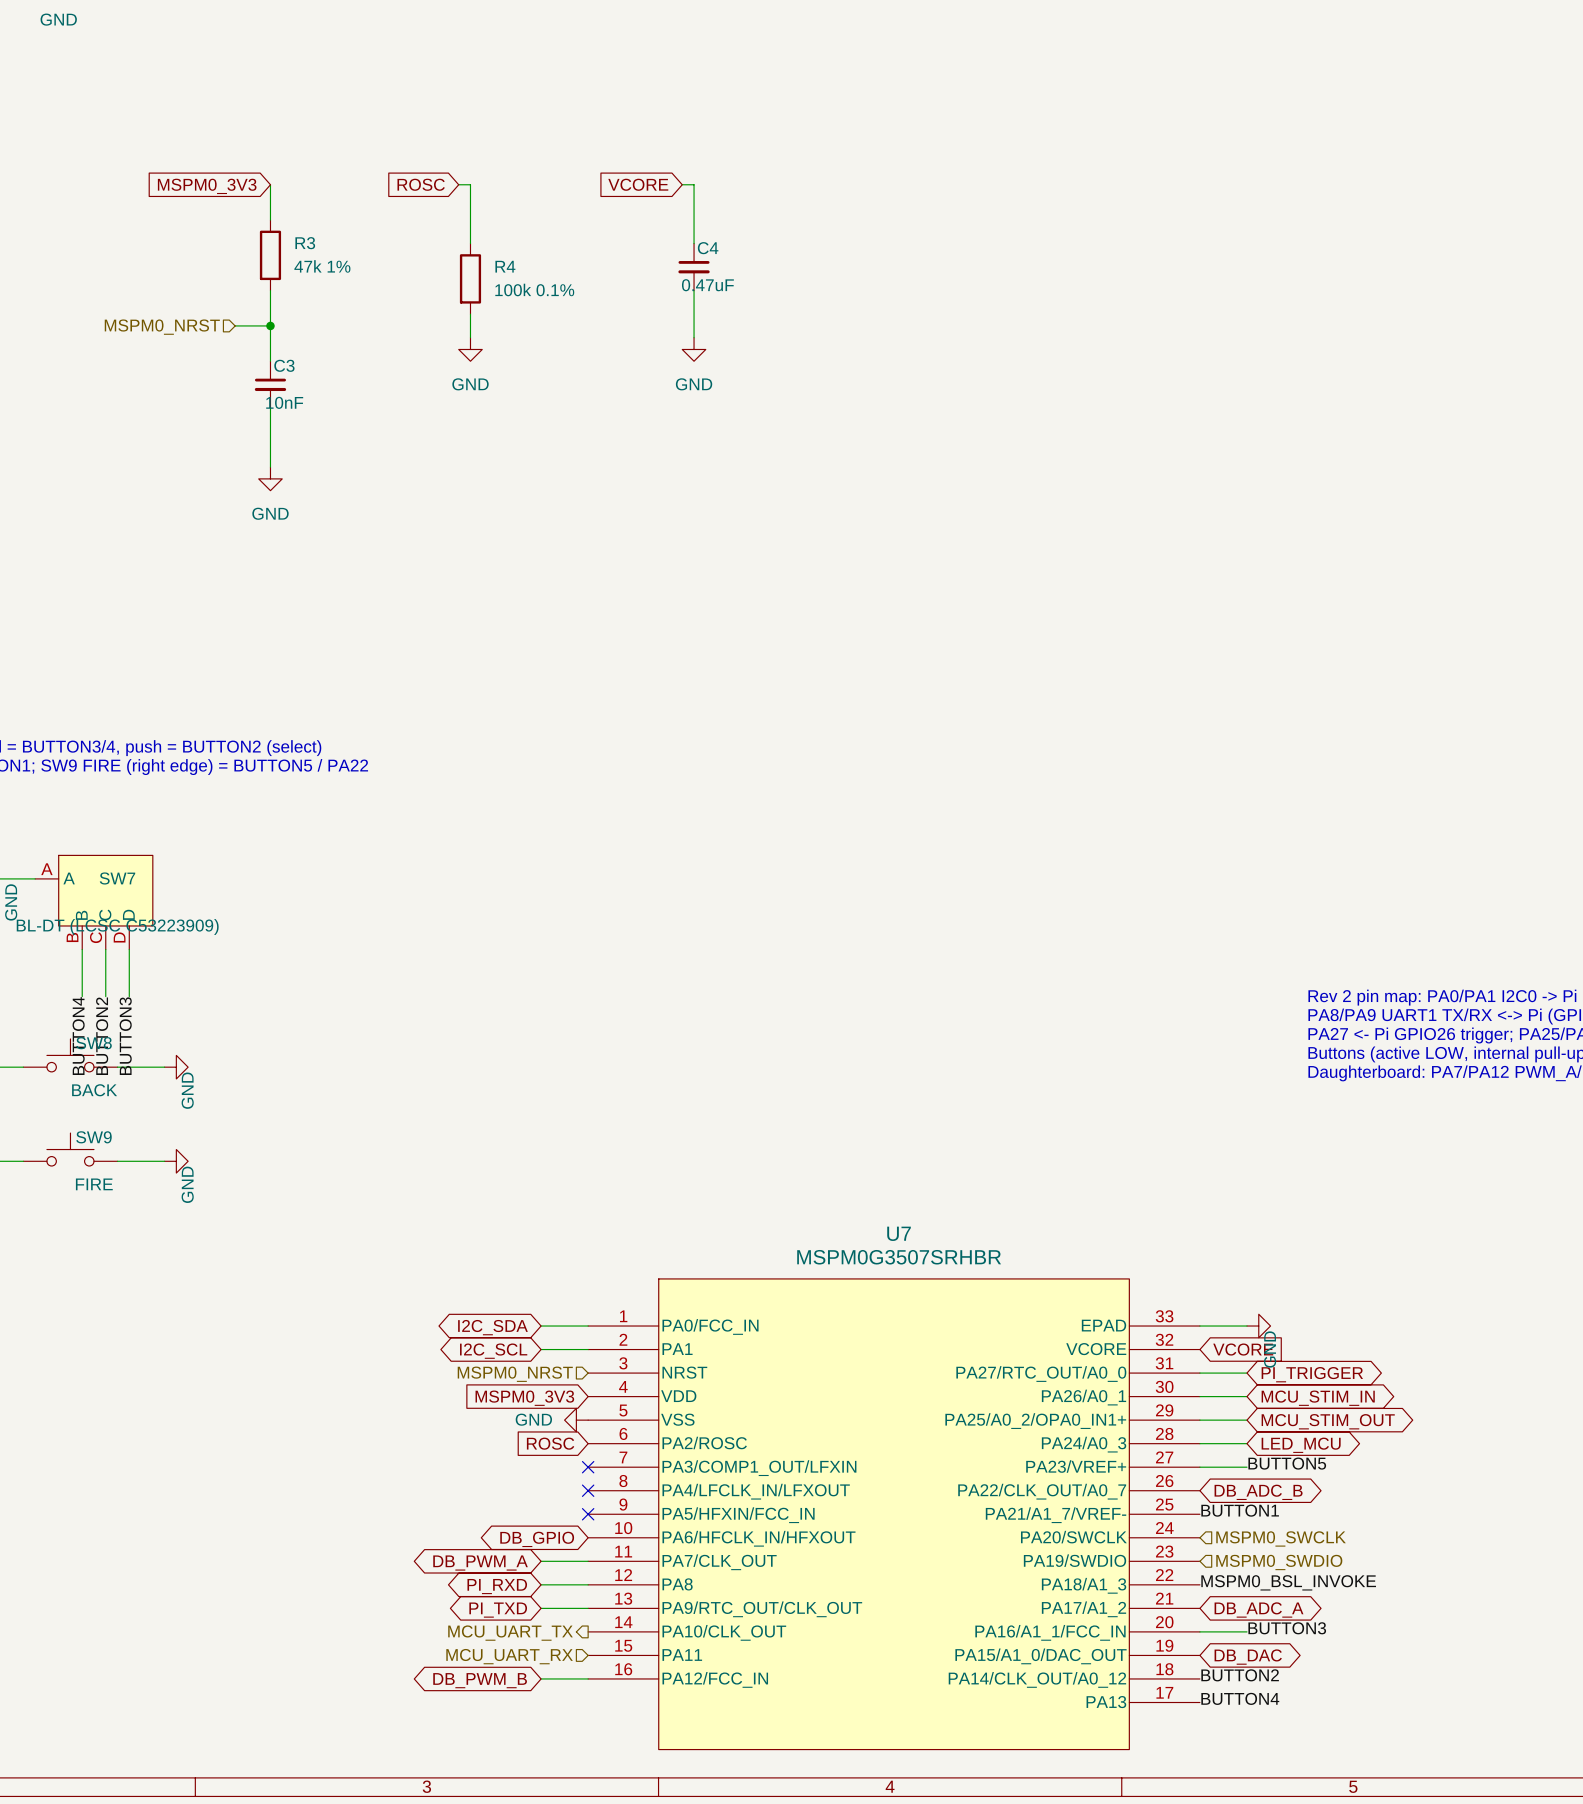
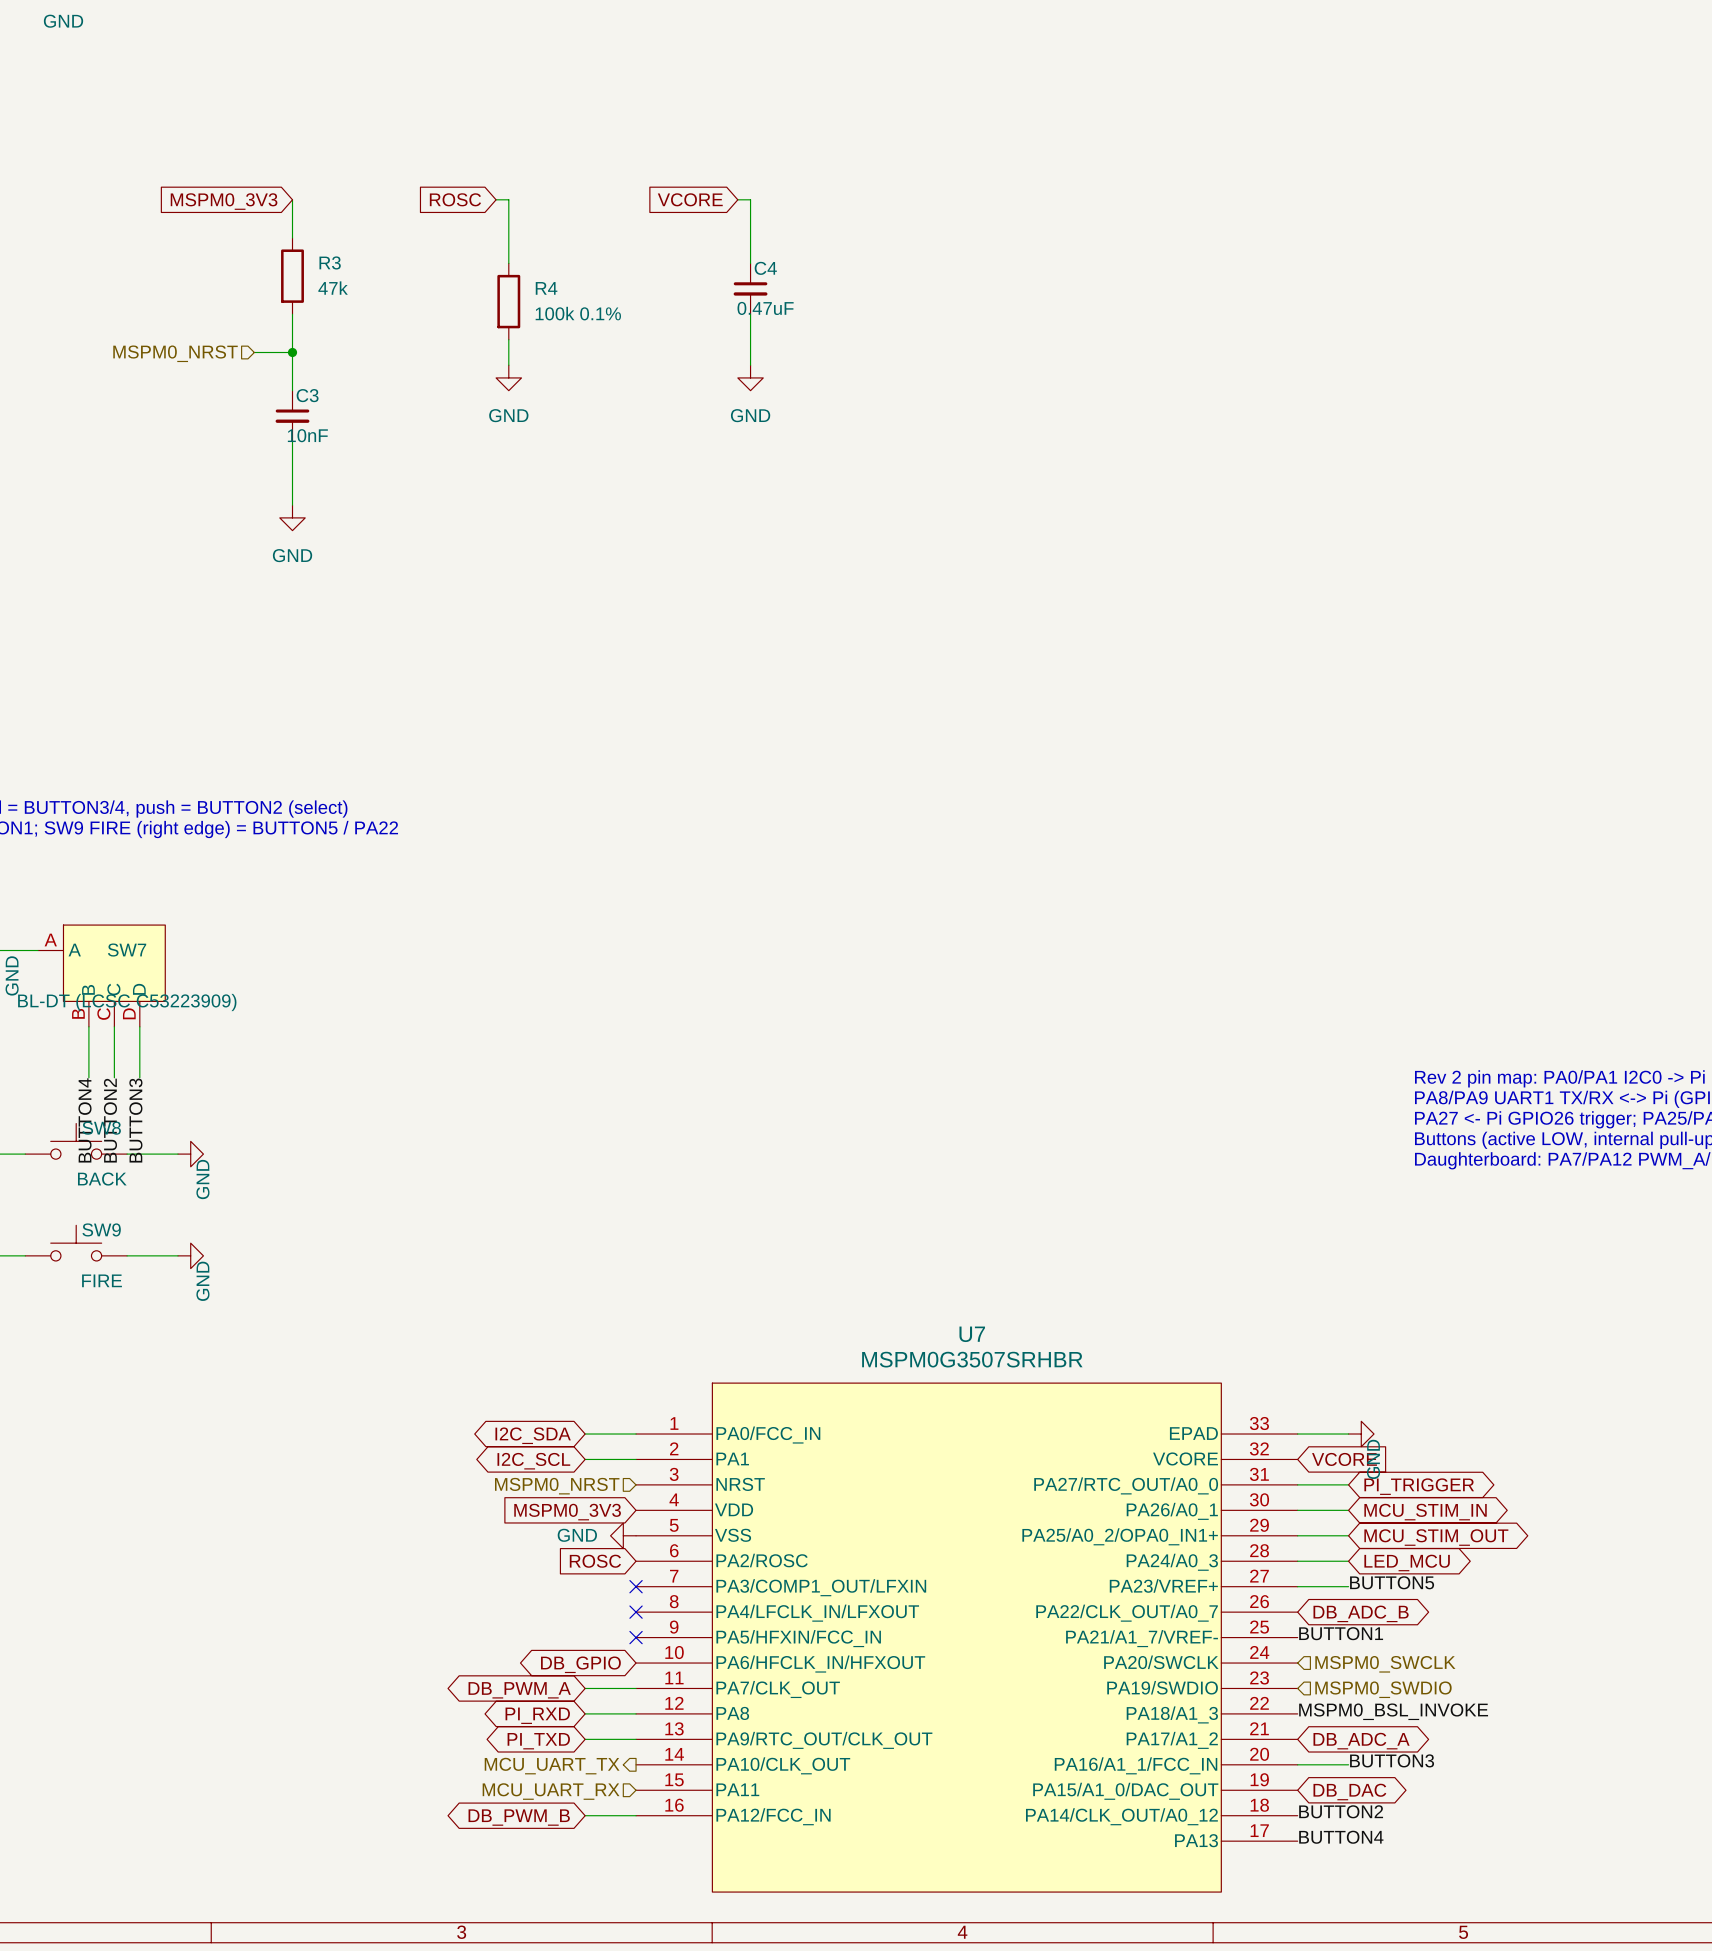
R3 value: 47k 1% (322, 266) -> 47k (333, 288)

